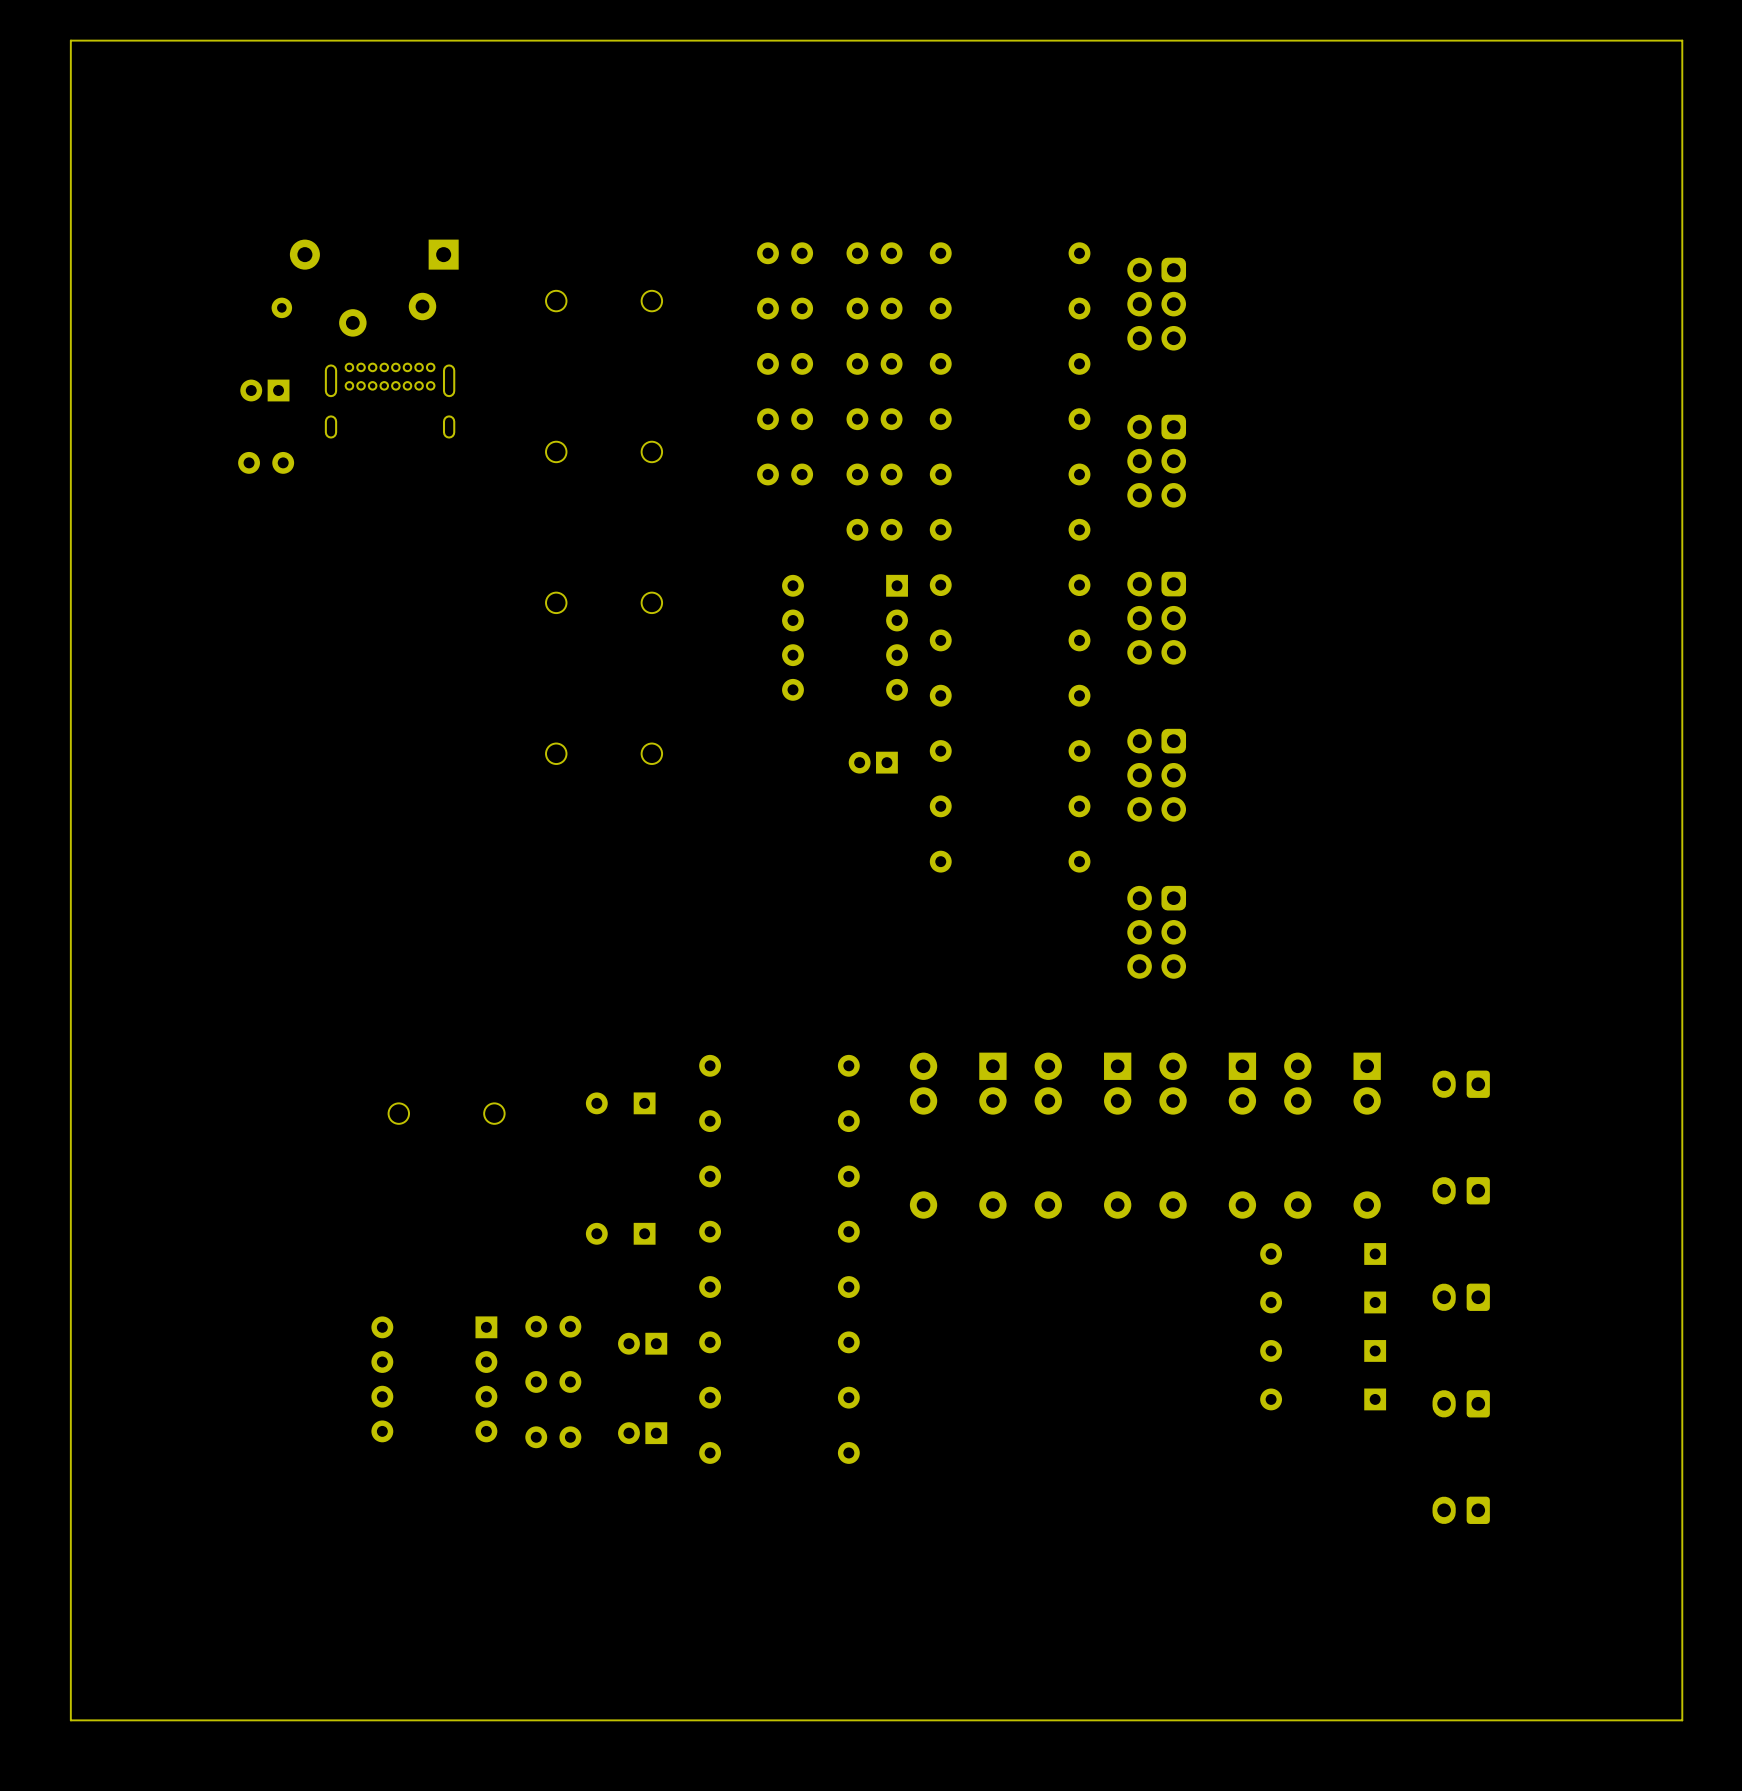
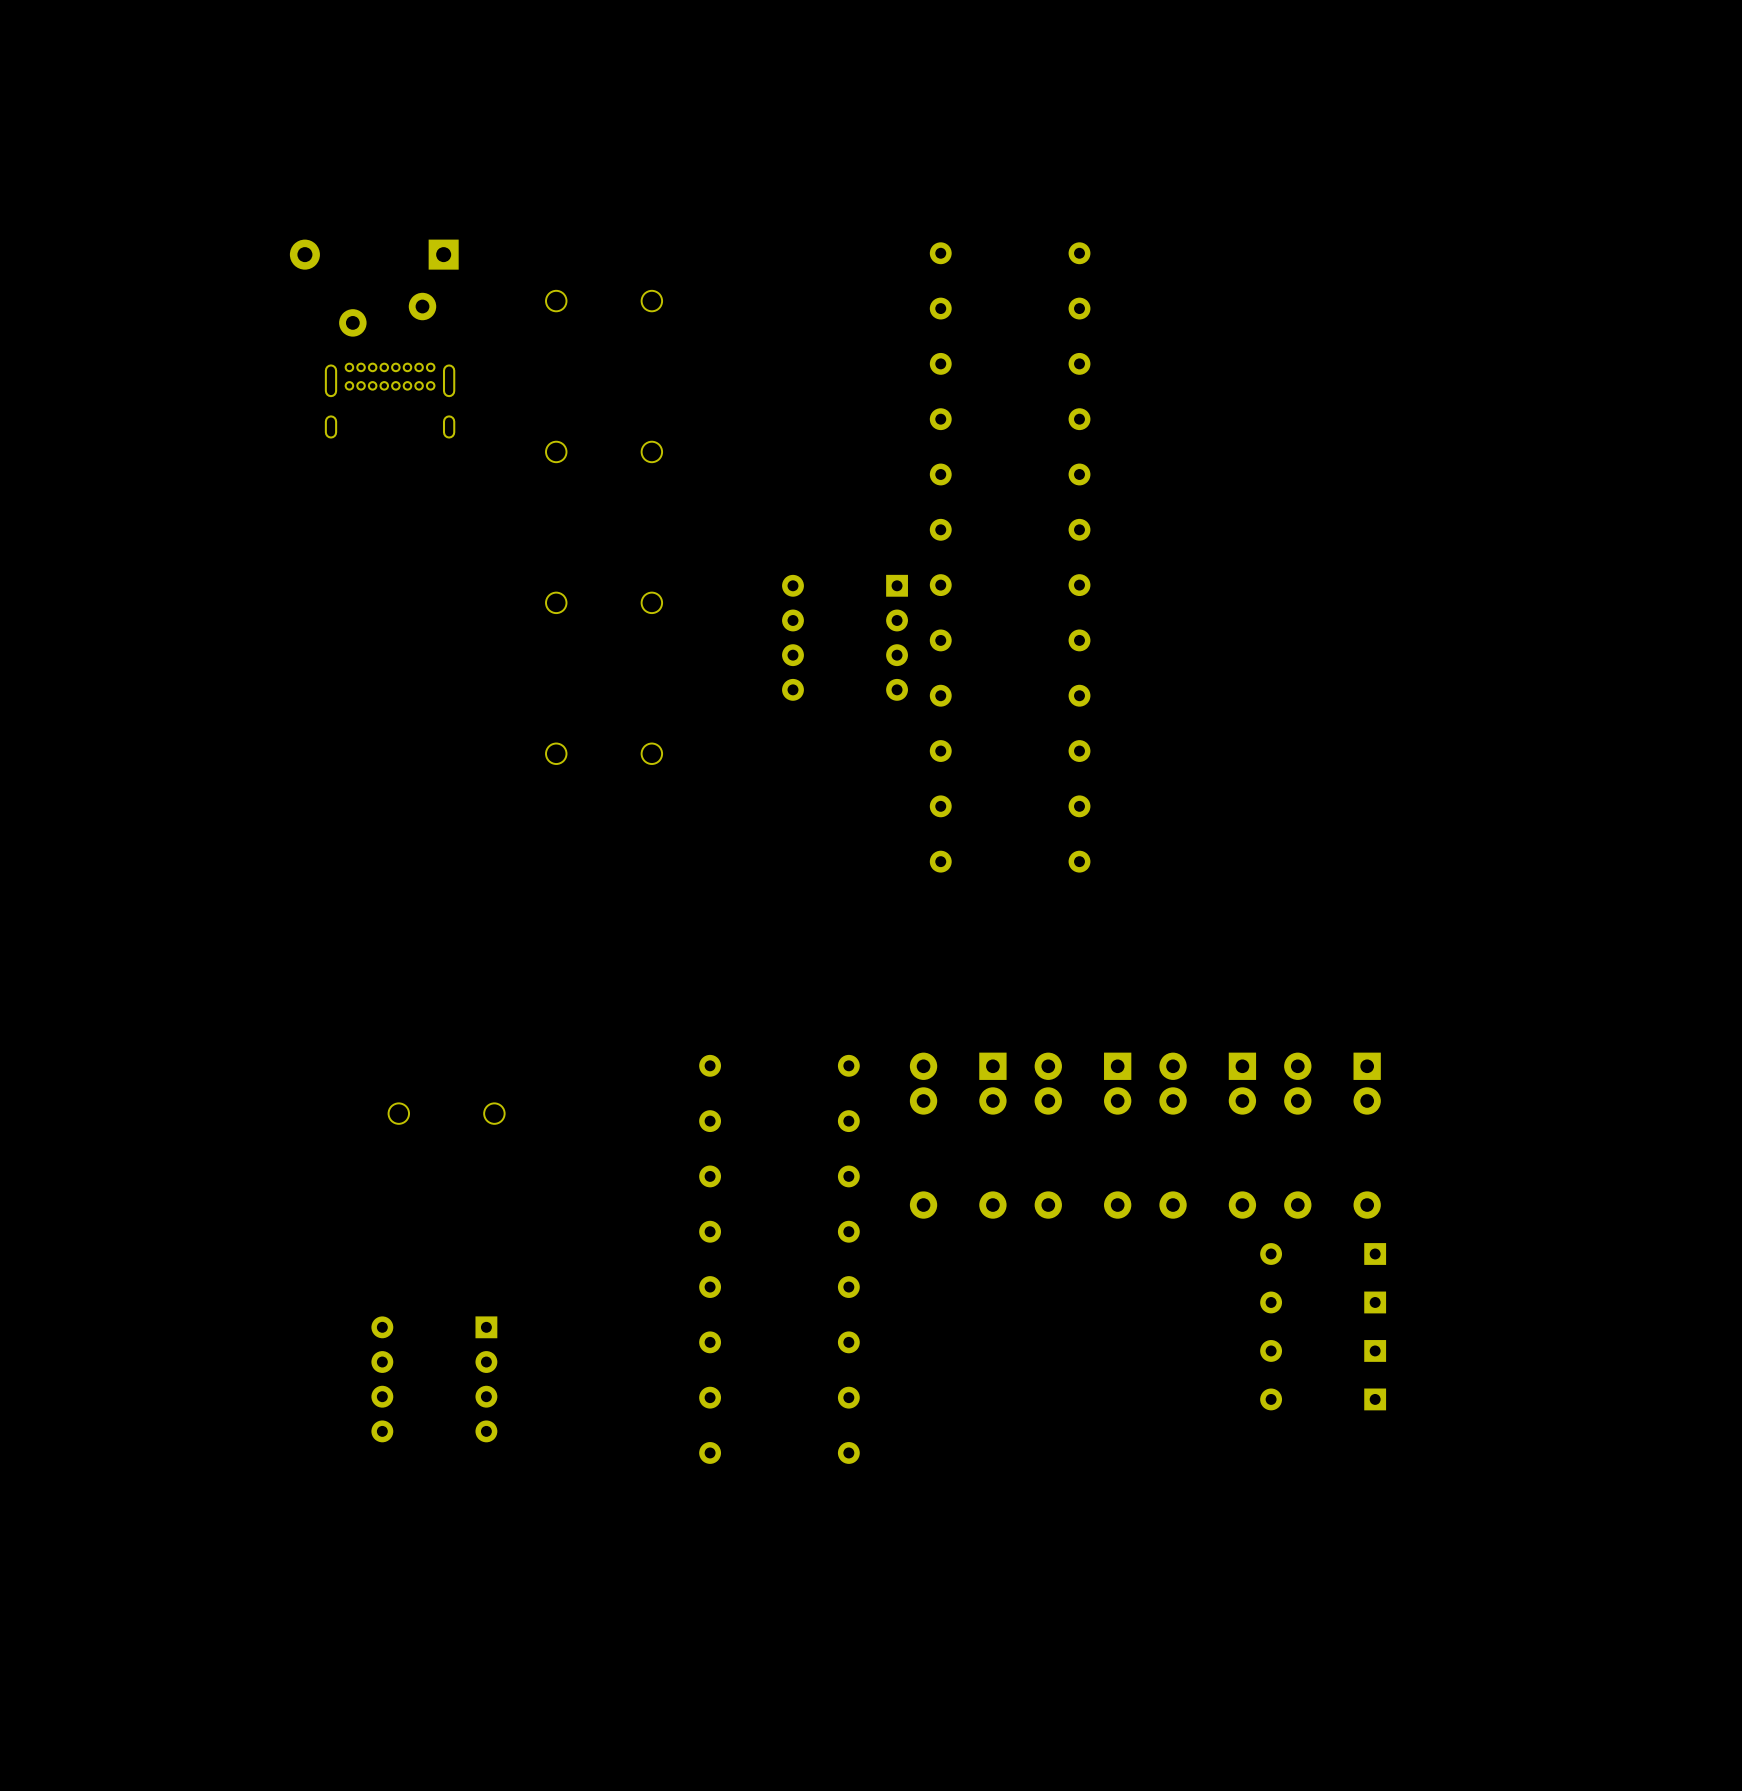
board edge: (1682, 40) (70, 40) (70, 1720) (1682, 1720) (1682, 40) -> none
part: (785, 253) -> none
part: (874, 253) -> none
part: (1156, 304) -> none
part: (281, 307) -> none
part: (785, 308) -> none
part: (874, 308) -> none
part: (785, 363) -> none
part: (874, 363) -> none
part: (264, 390) -> none
part: (785, 419) -> none
part: (874, 419) -> none
part: (1156, 461) -> none
part: (266, 462) -> none
part: (785, 474) -> none
part: (874, 474) -> none
part: (874, 529) -> none
part: (1156, 618) -> none
part: (873, 762) -> none
part: (1156, 775) -> none
part: (1156, 932) -> none
part: (1461, 1084) -> none
part: (620, 1103) -> none
part: (1461, 1190) -> none
part: (620, 1233) -> none
part: (1461, 1297) -> none
part: (553, 1326) -> none
part: (642, 1343) -> none
part: (553, 1381) -> none
part: (1461, 1403) -> none
part: (642, 1433) -> none
part: (553, 1437) -> none
part: (1461, 1510) -> none

